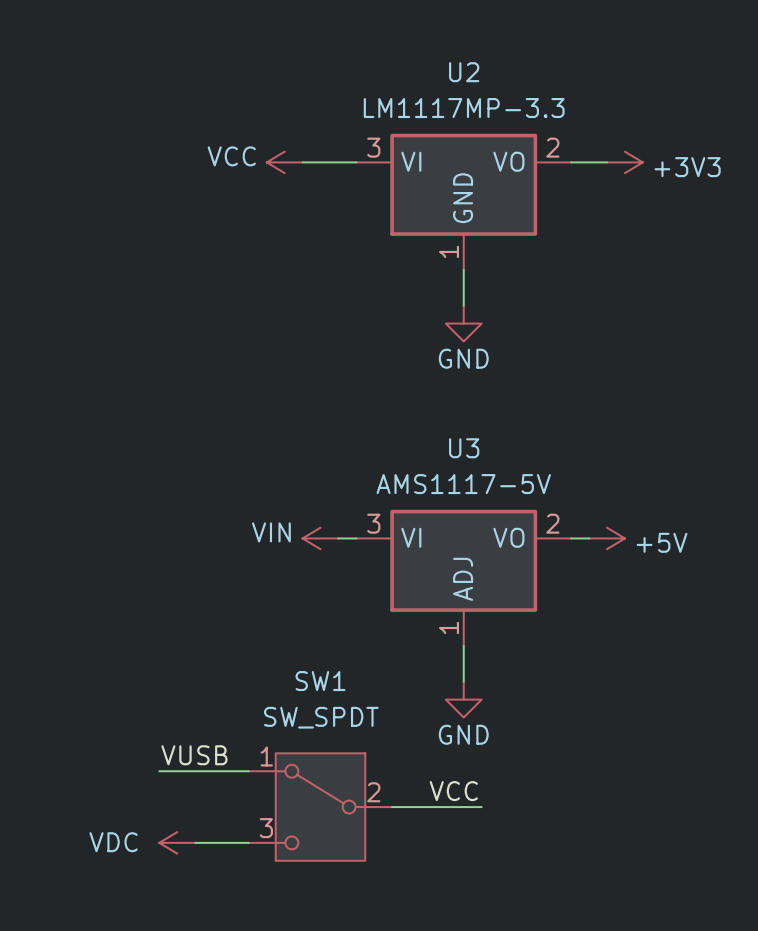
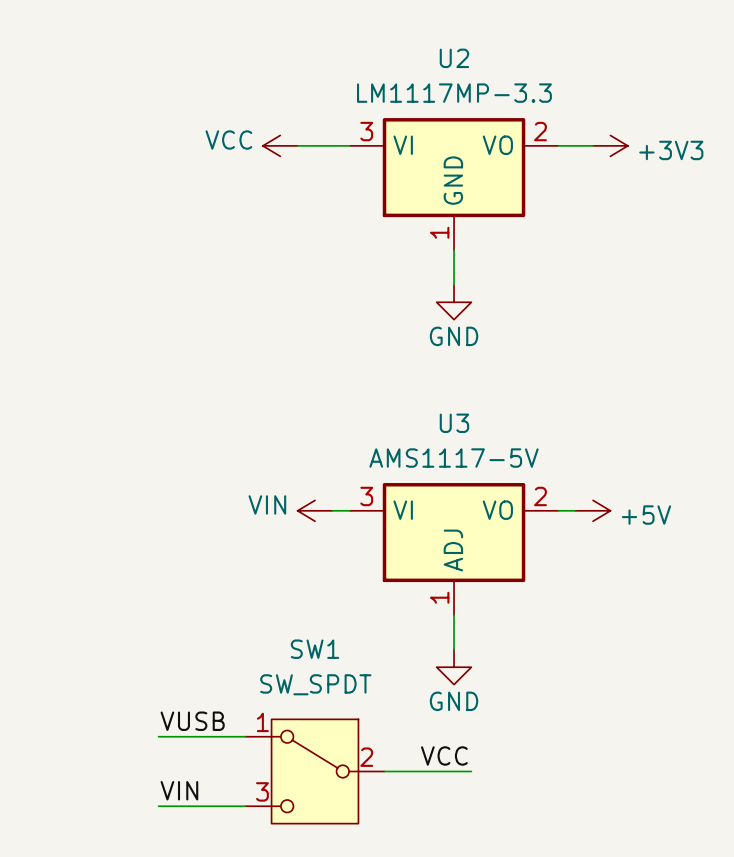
label: none -> VIN (179, 790)
power symbol: VDC (177, 842) -> none

